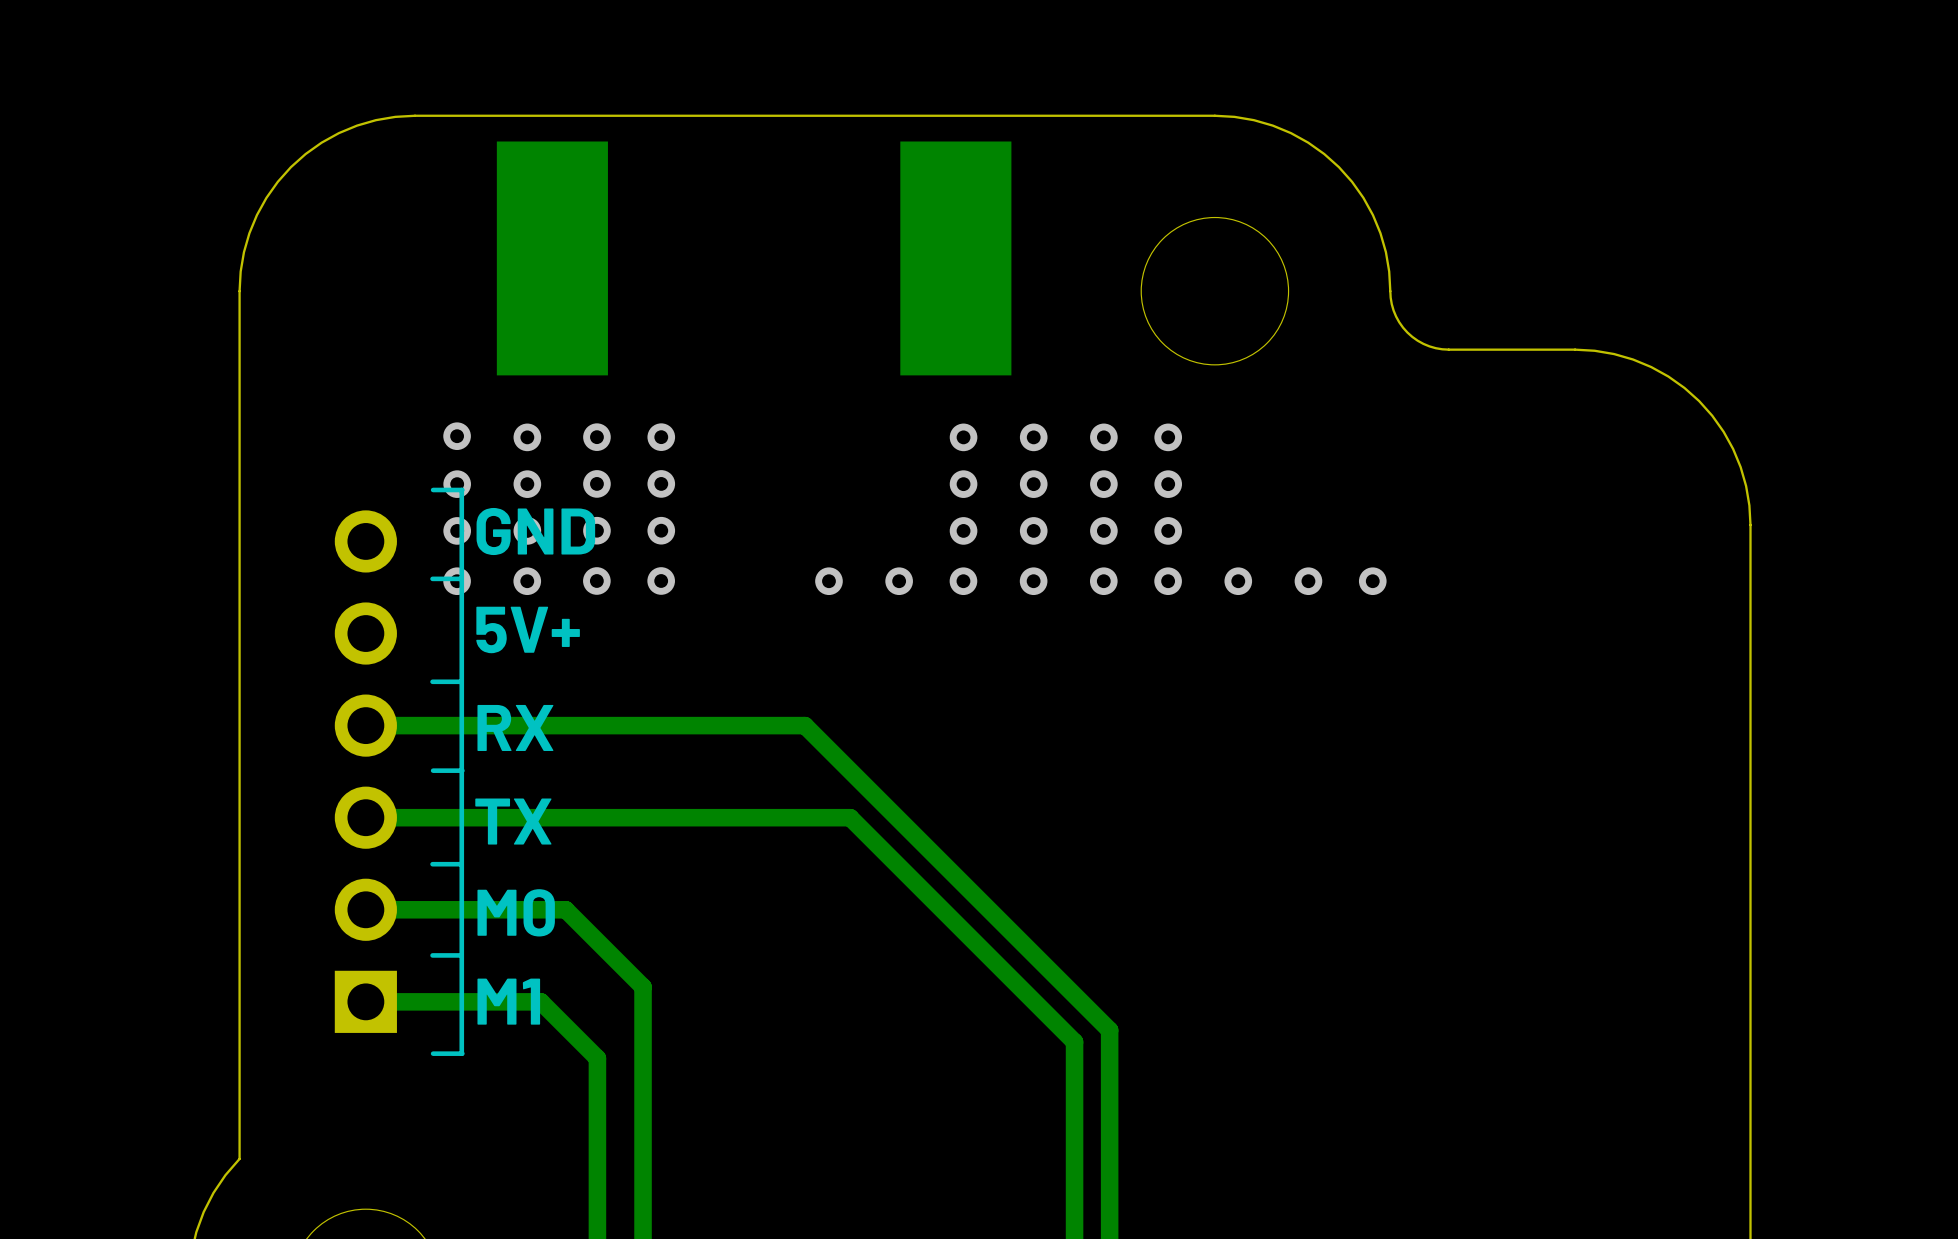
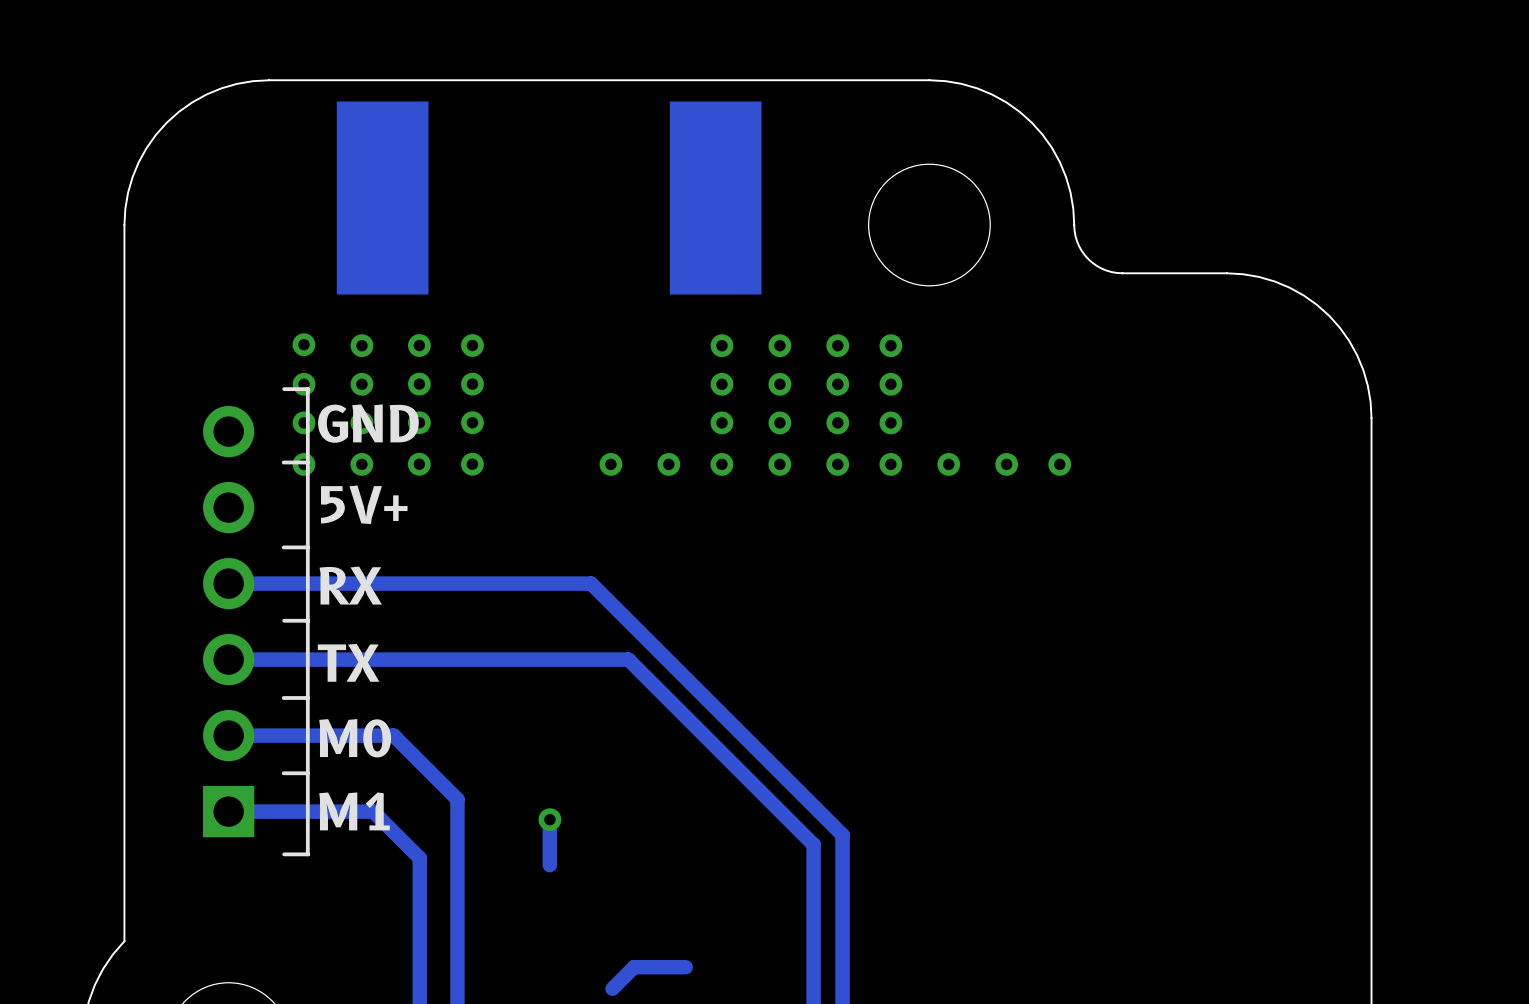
track: none -> (549, 819) (549, 865)
via: none -> (549, 819)
track: none -> (685, 967) (634, 967) (612, 988)

